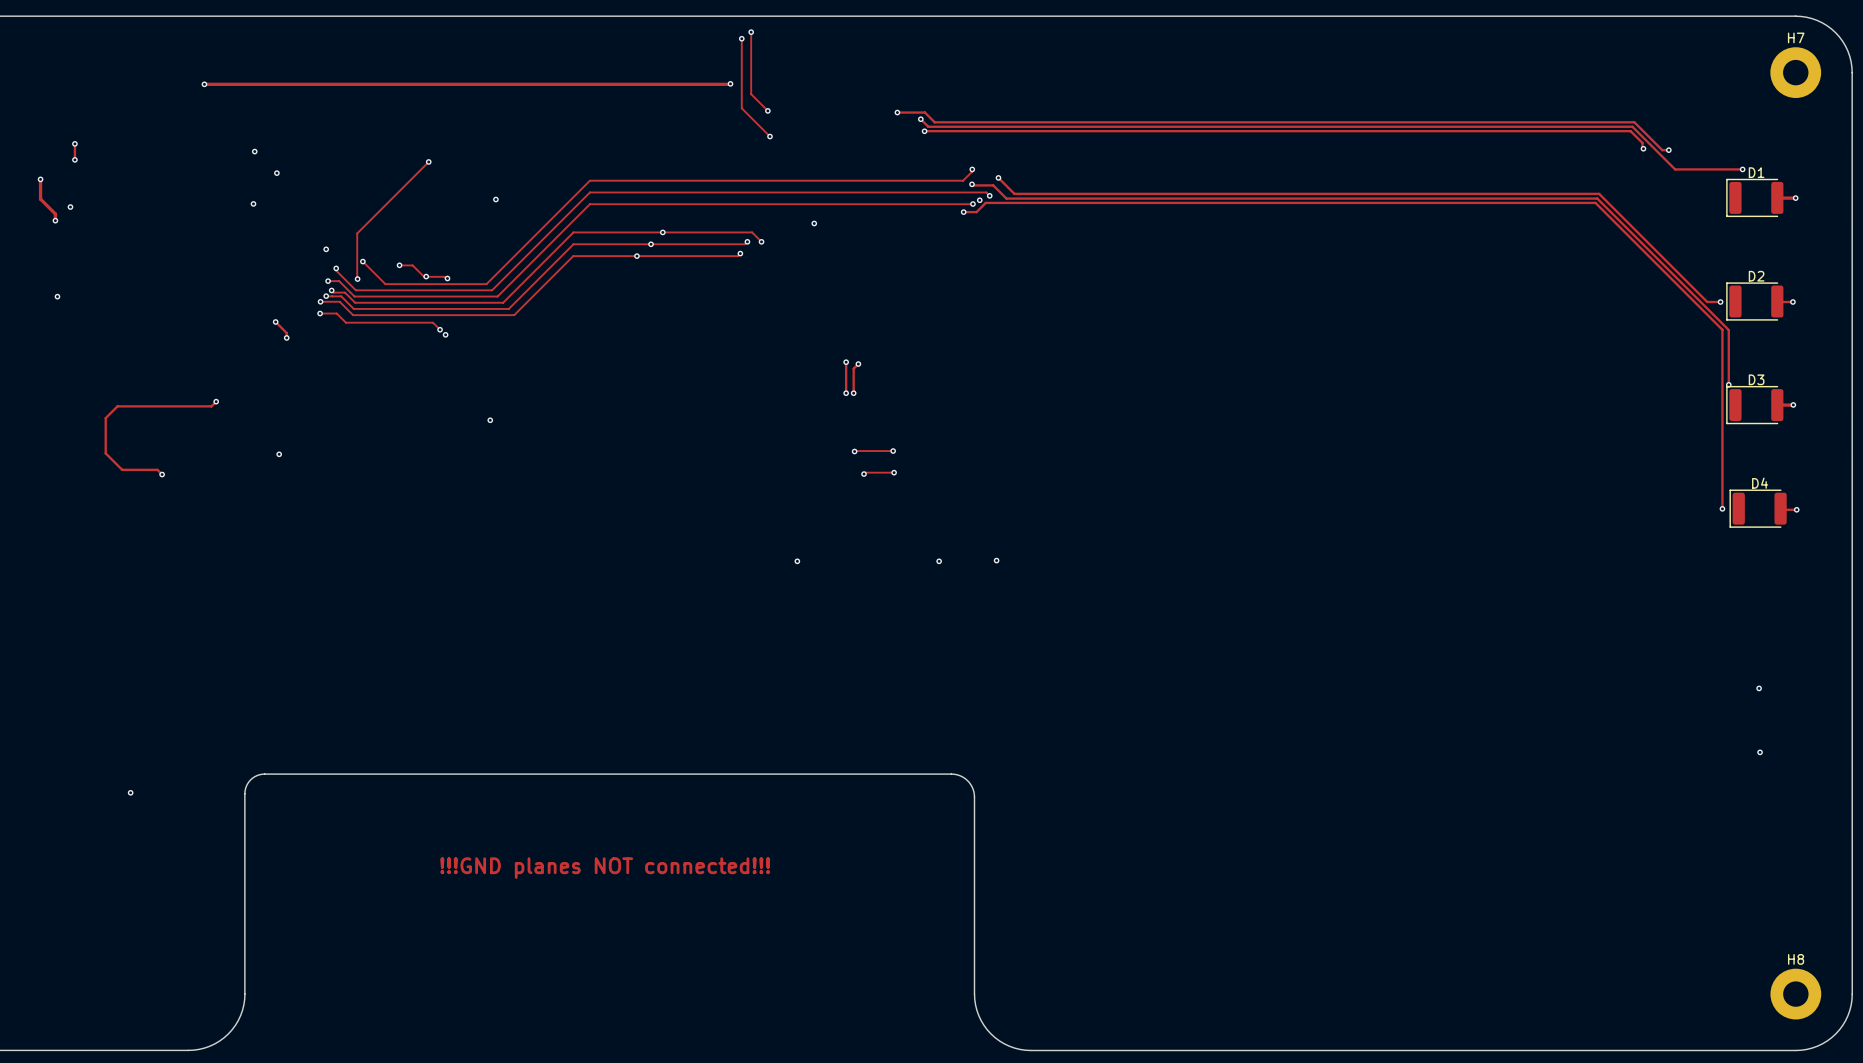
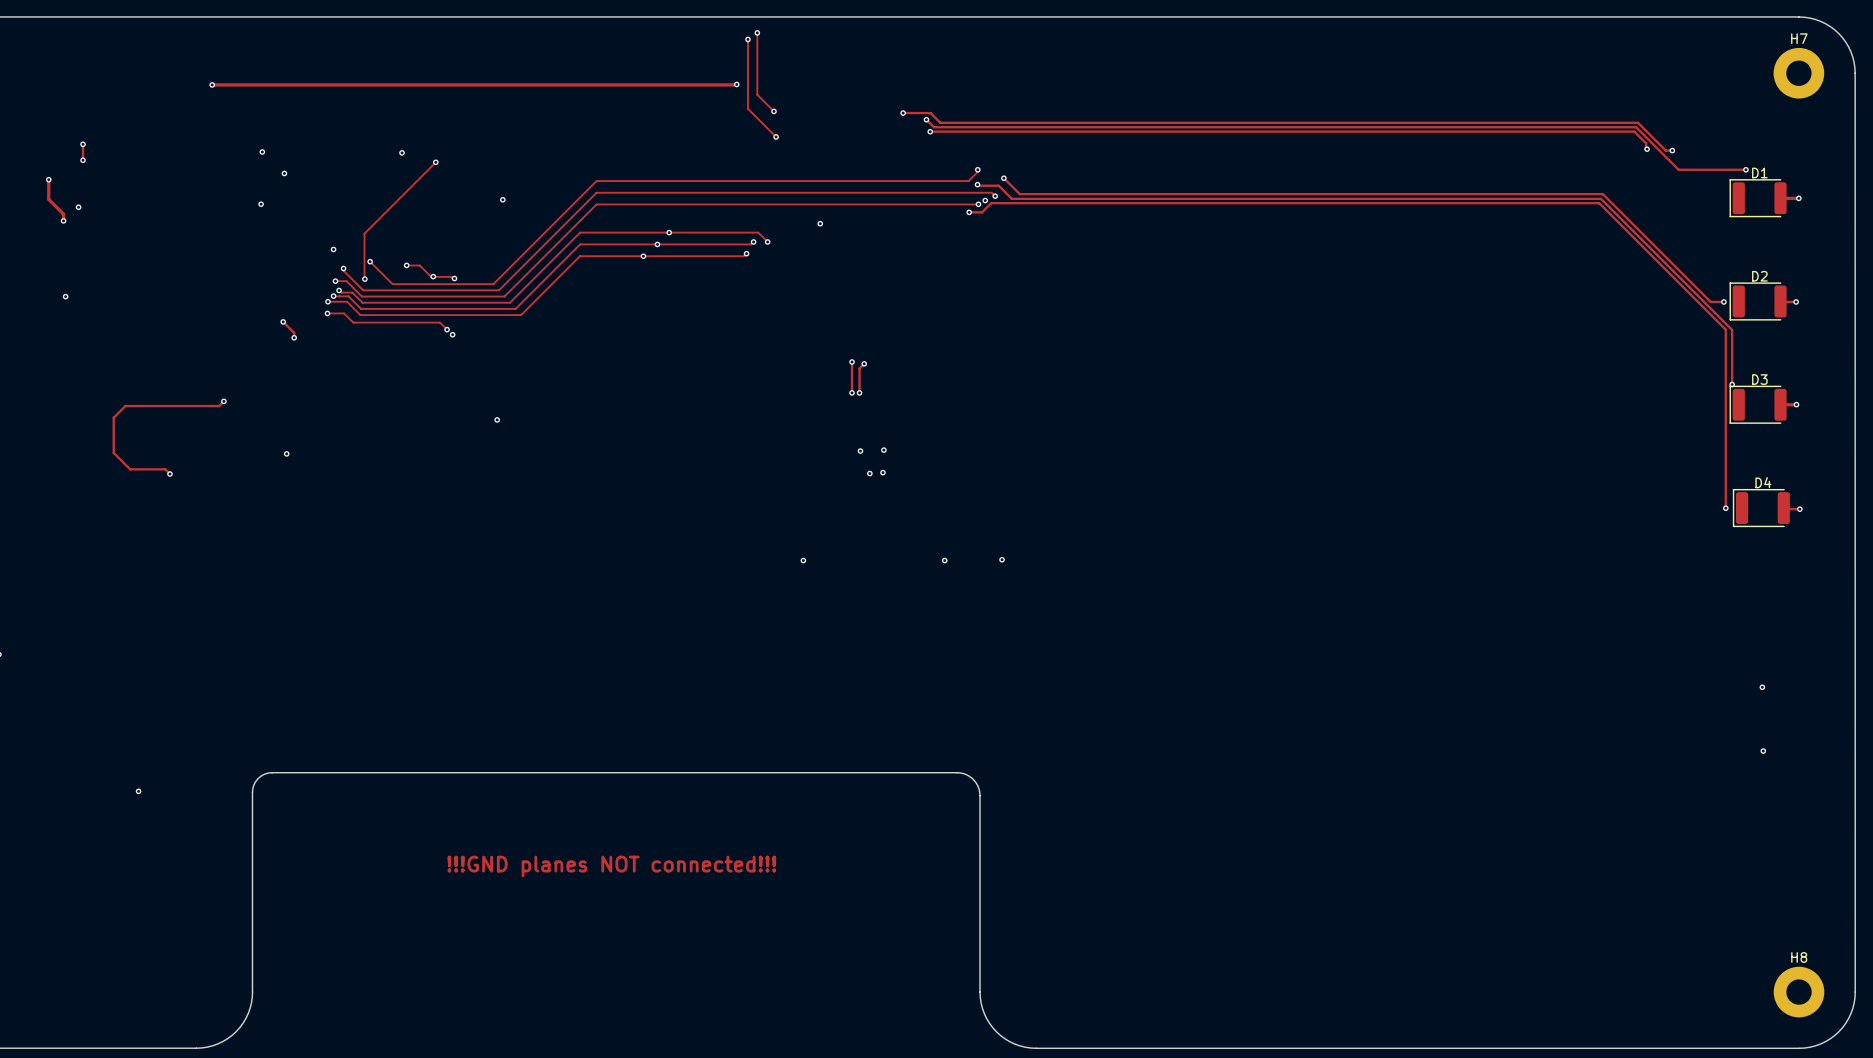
via: none -> (402, 152)
via: none -> (883, 450)
track: (855, 451) (893, 451) -> none
via: (893, 451) -> none
track: (865, 472) (894, 472) -> none
via: (894, 472) -> none
via: none -> (882, 472)

